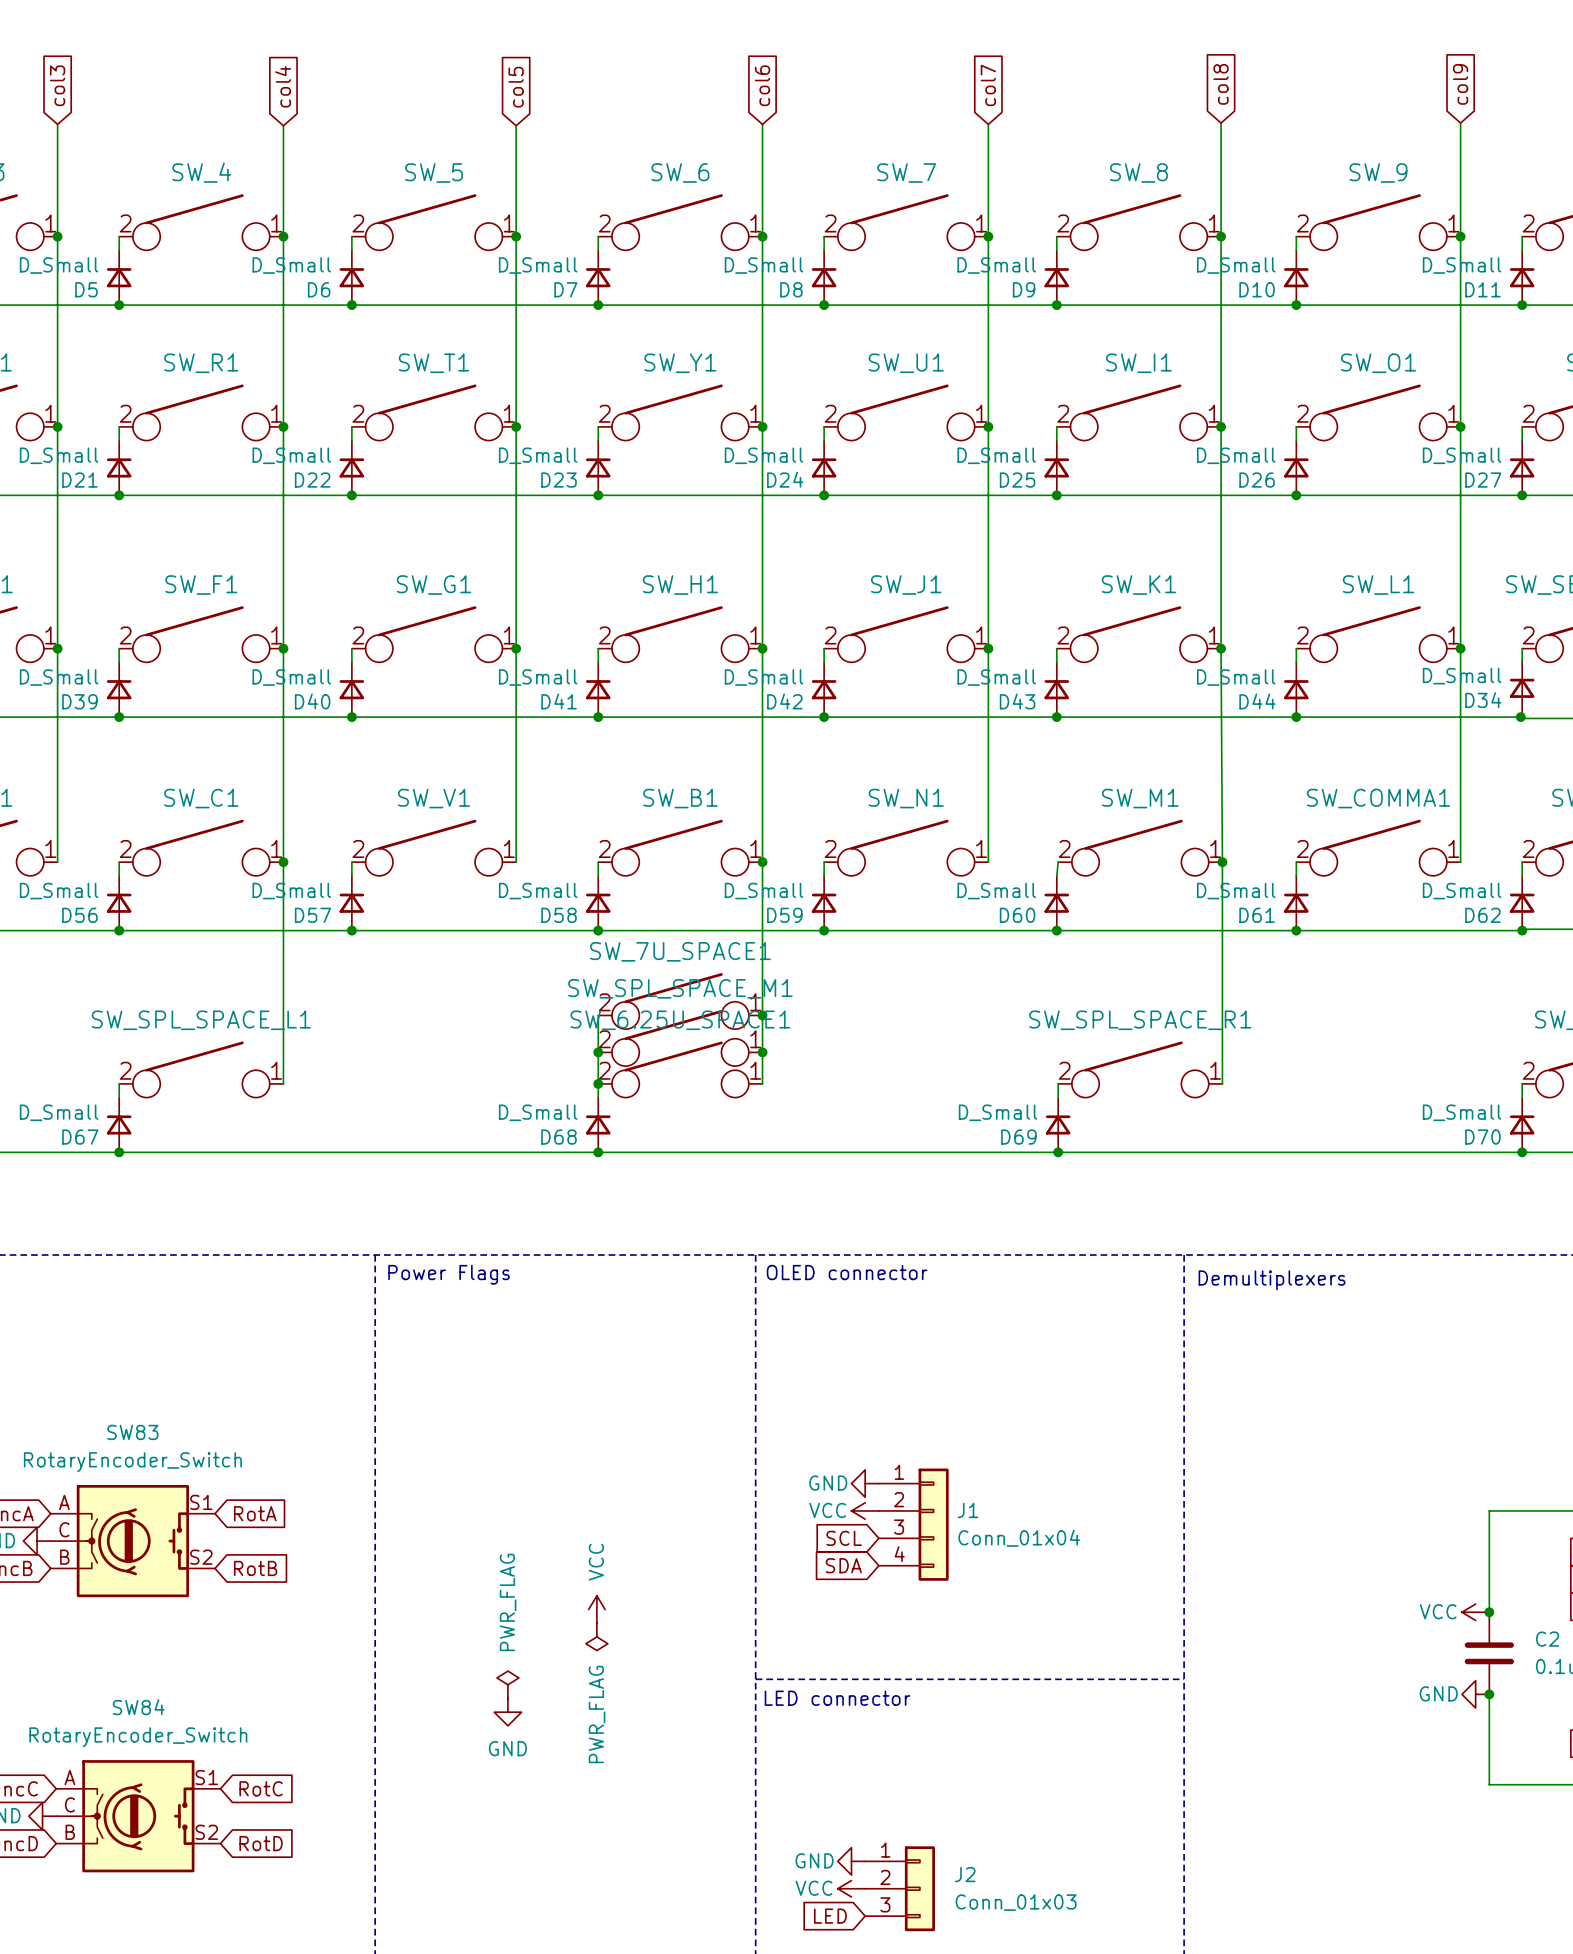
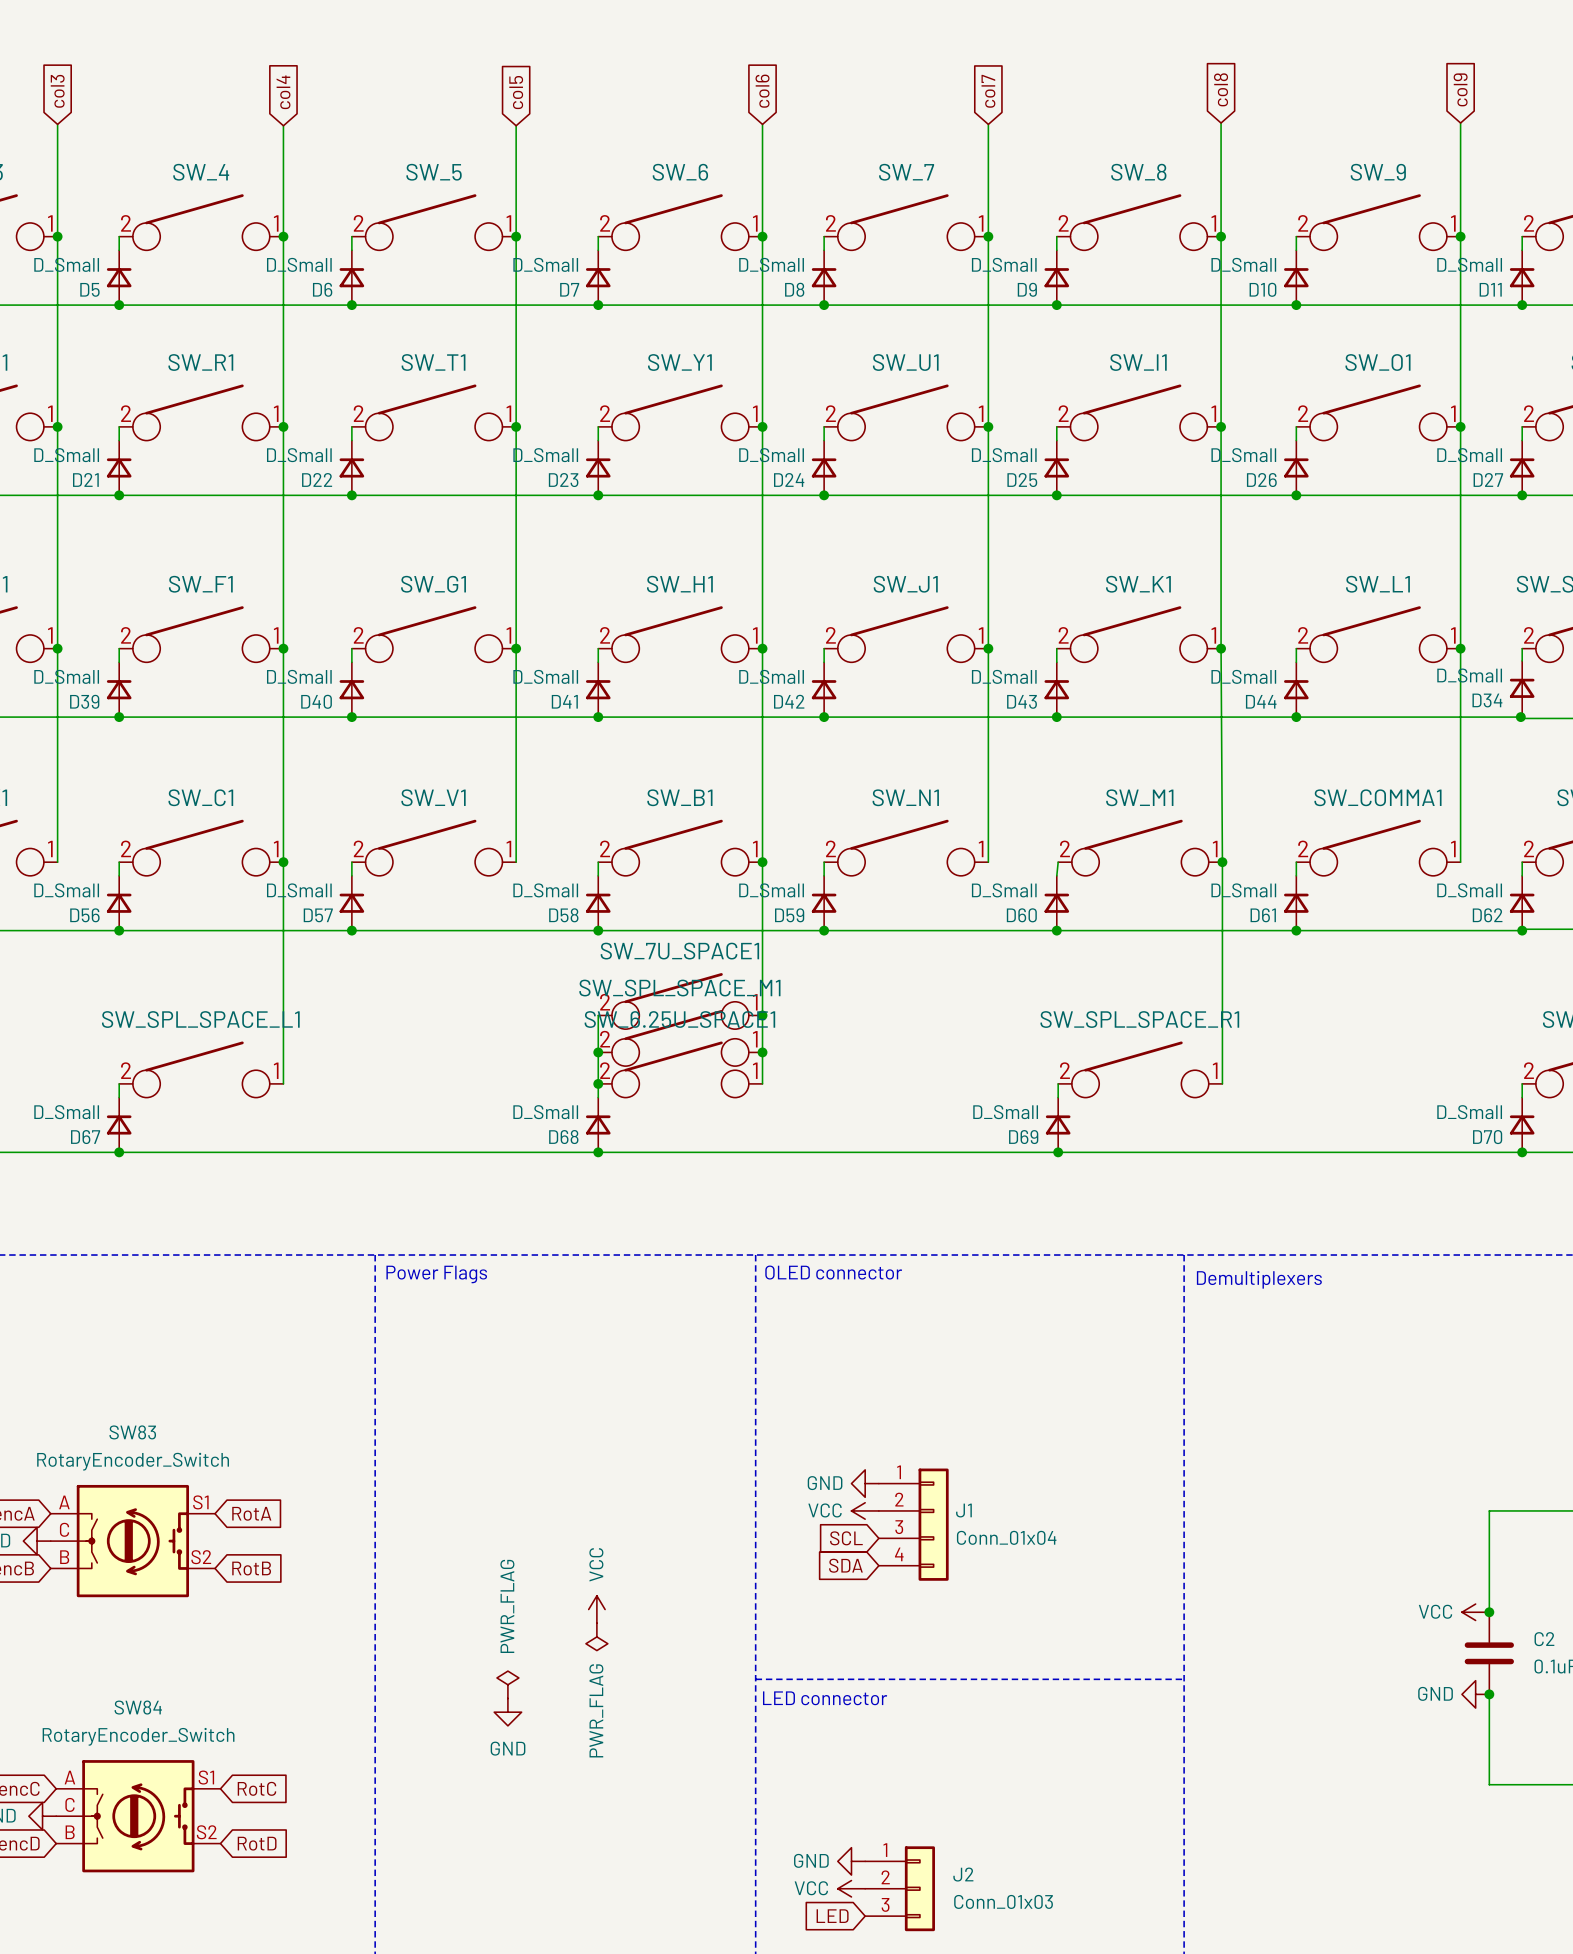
SW83 symbol: [50, 1484, 216, 1598] -> [50, 1484, 216, 1598]
SW84 symbol: [56, 1760, 221, 1873] -> [56, 1760, 221, 1873]

